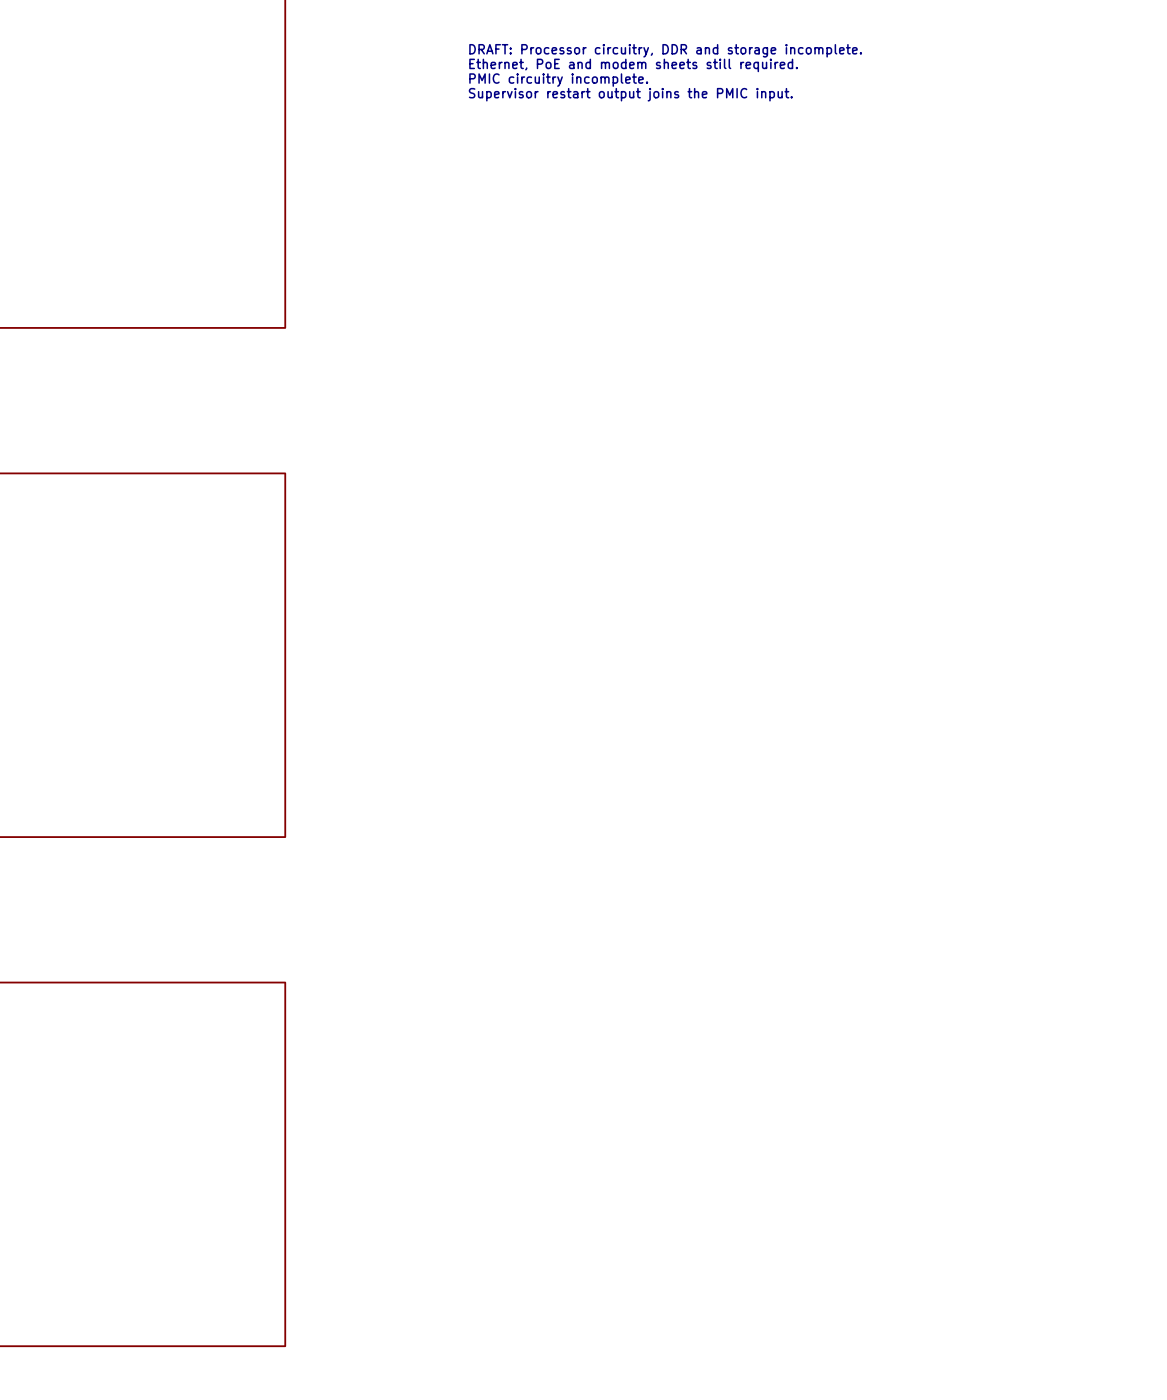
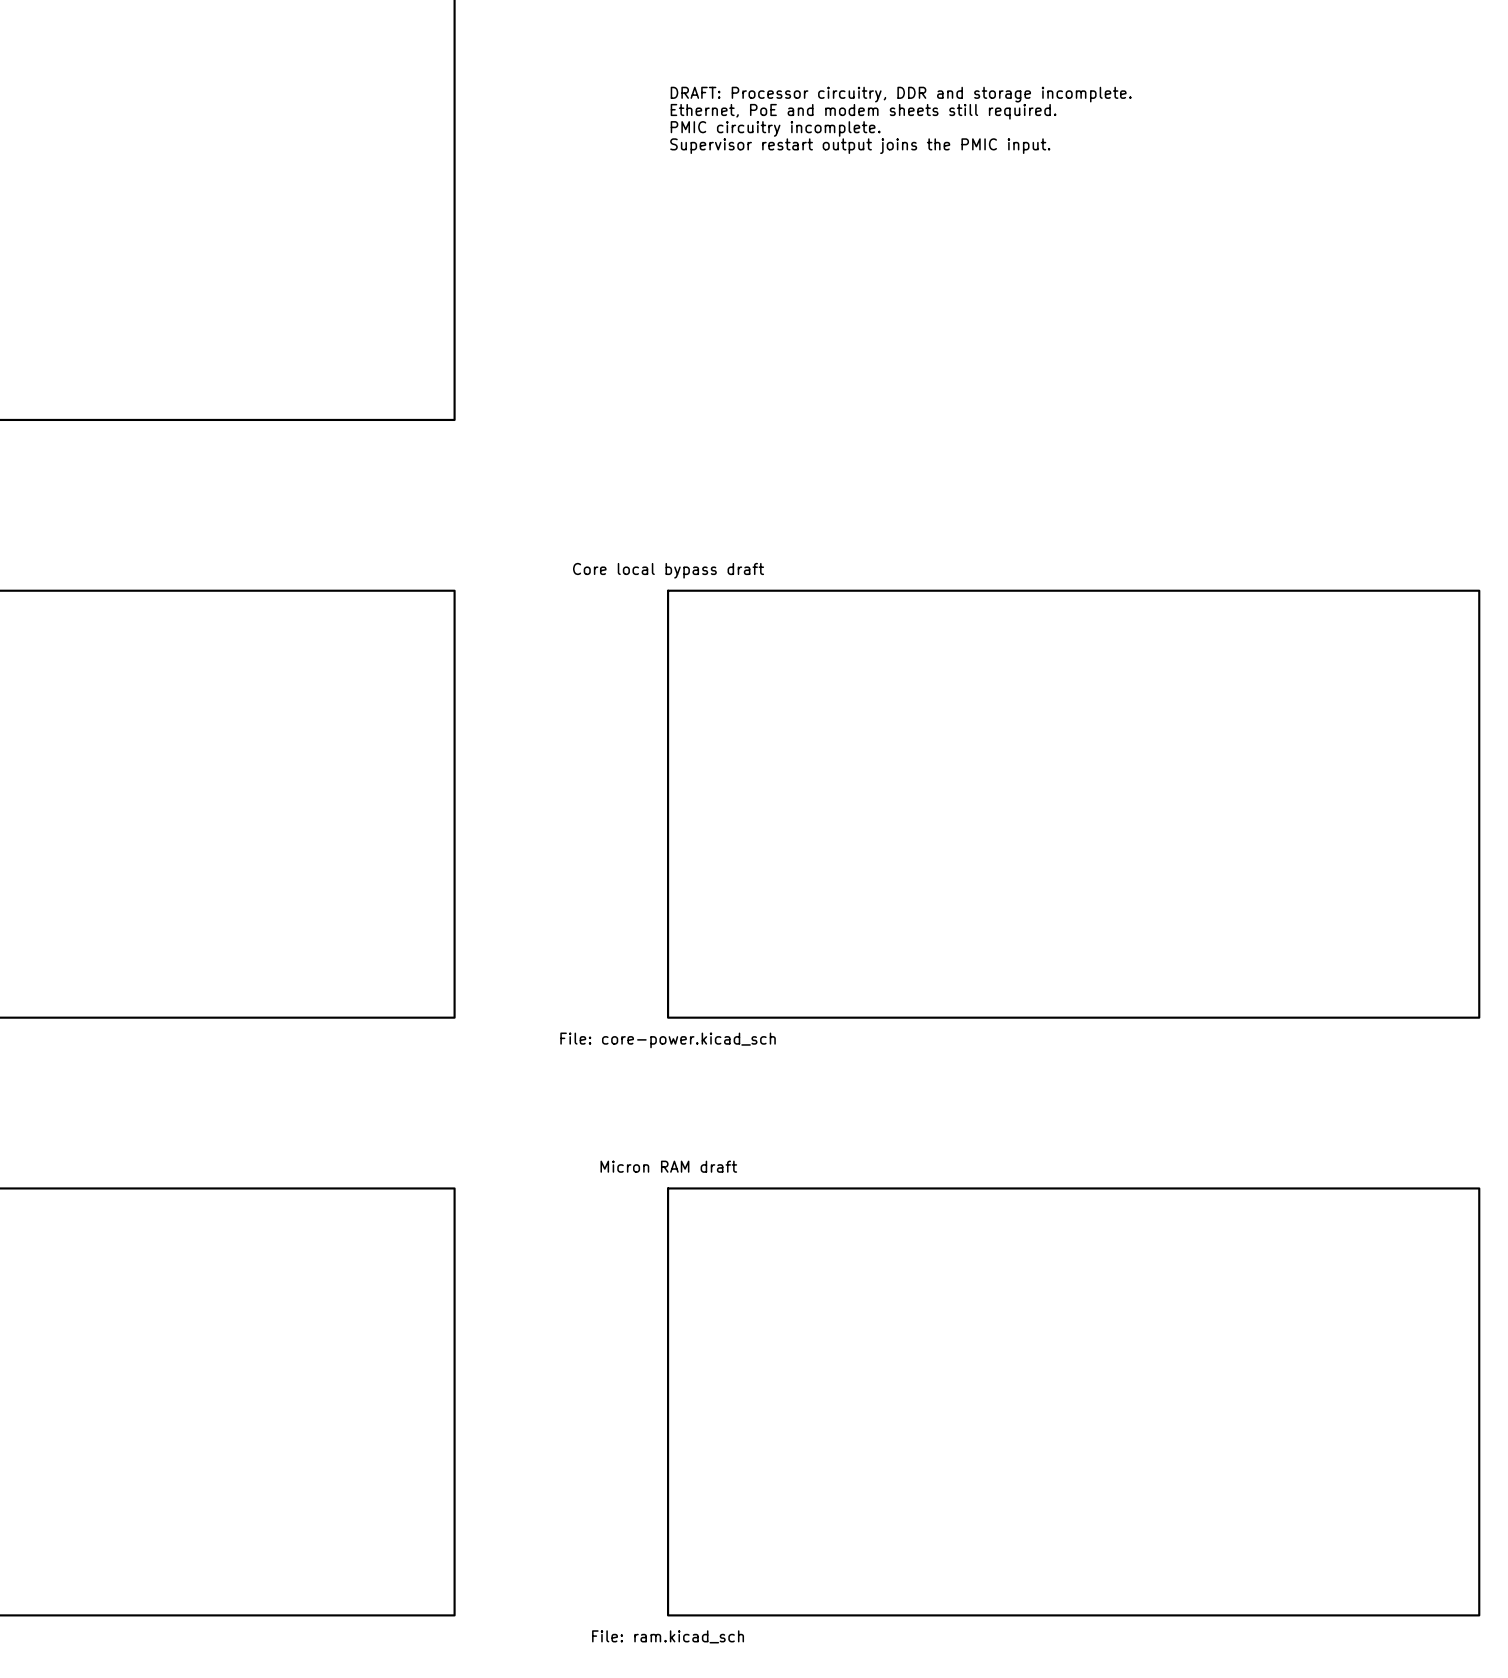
sheet Core local bypass draft: none -> File: core-power.kicad_sch (1073, 804)
sheet Micron RAM draft: none -> File: ram.kicad_sch (1073, 1401)

